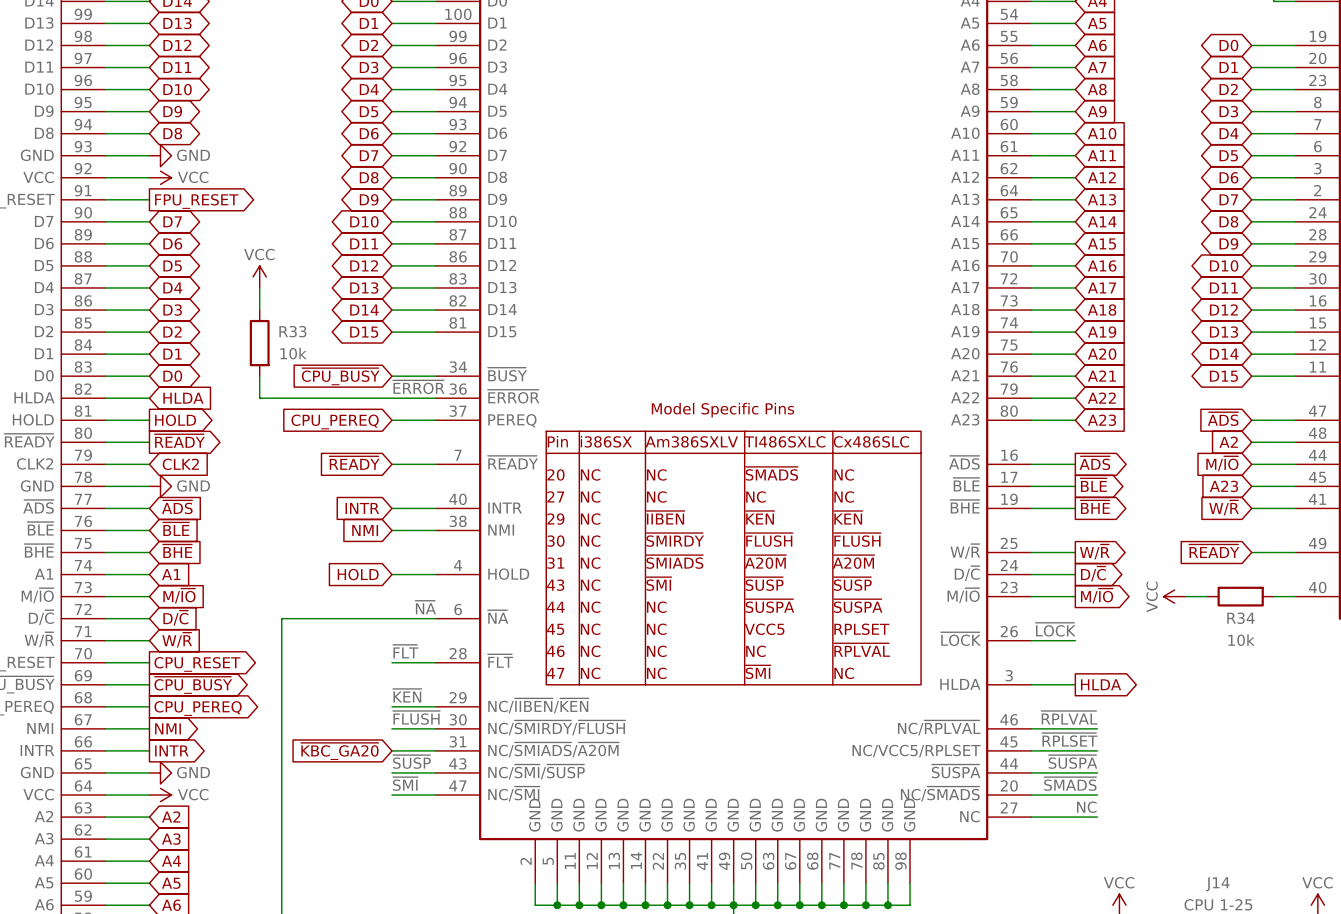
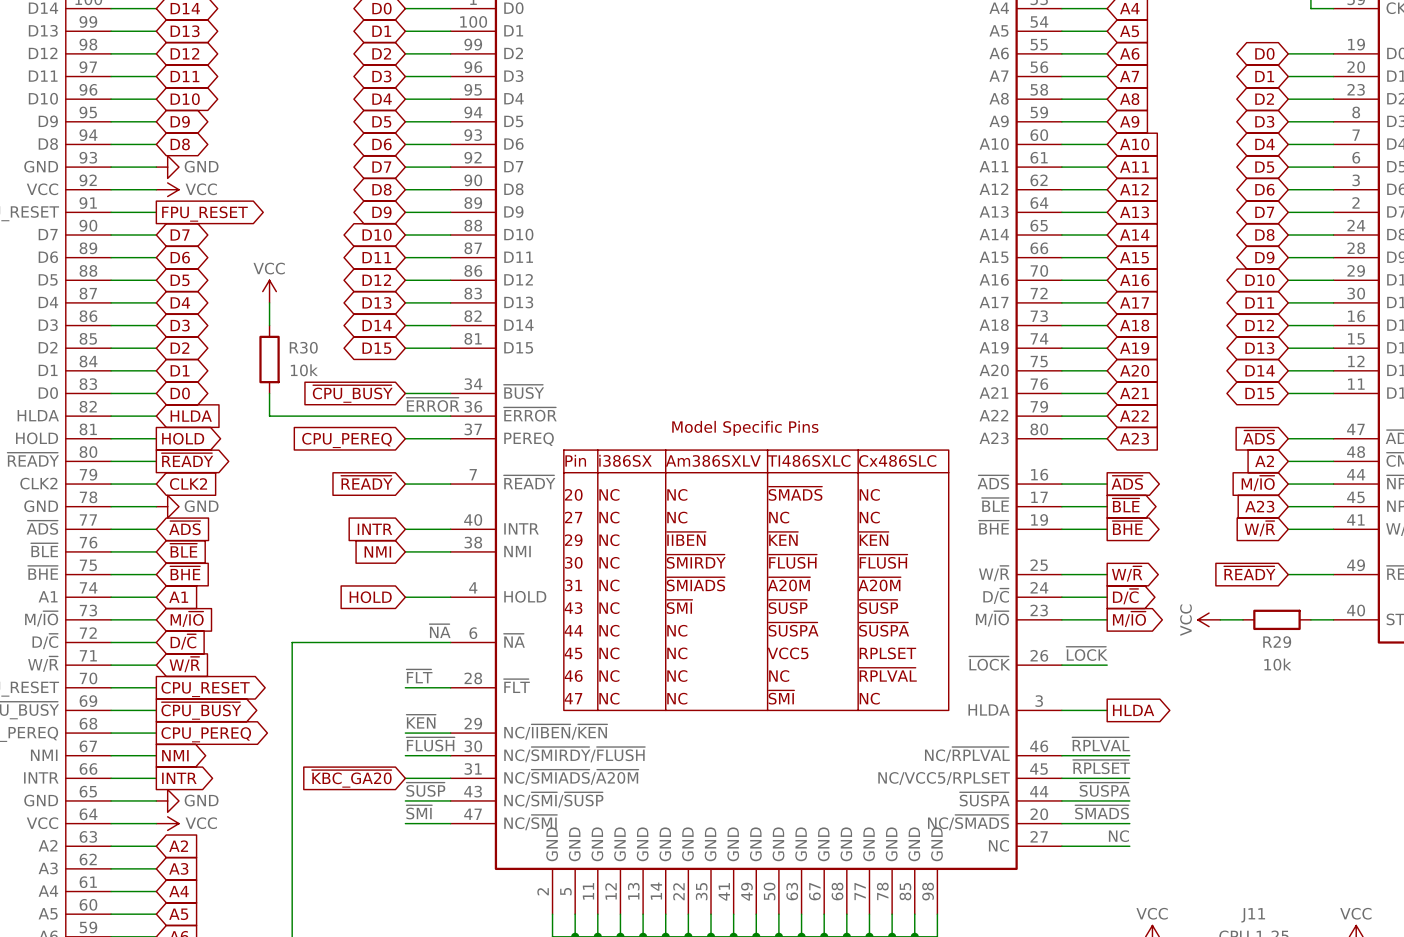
R33 name: R33 (292, 331) -> R30 (303, 347)
R34 name: R34 (1241, 618) -> R29 (1277, 642)
J14 name: J14 (1217, 884) -> J11 (1253, 915)

